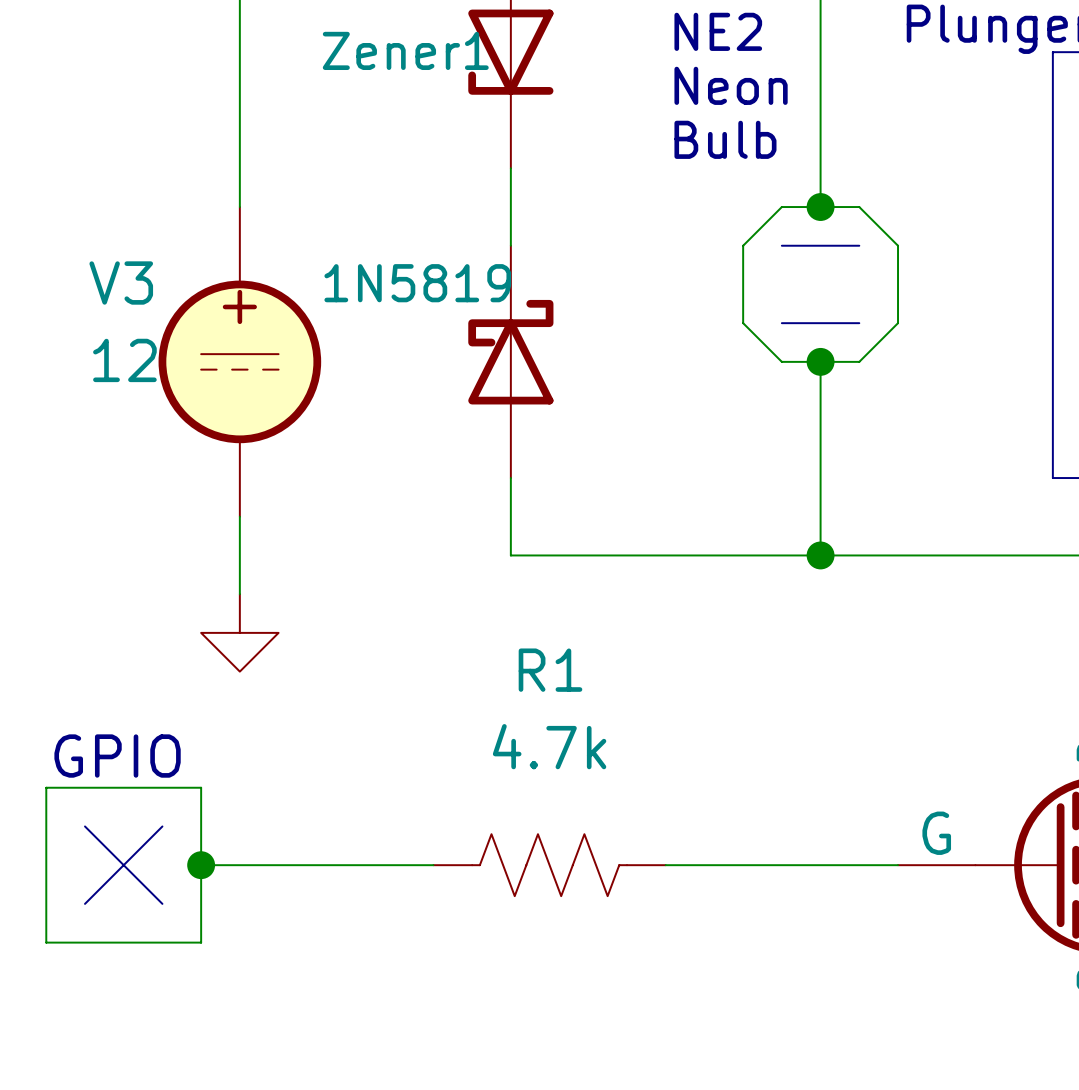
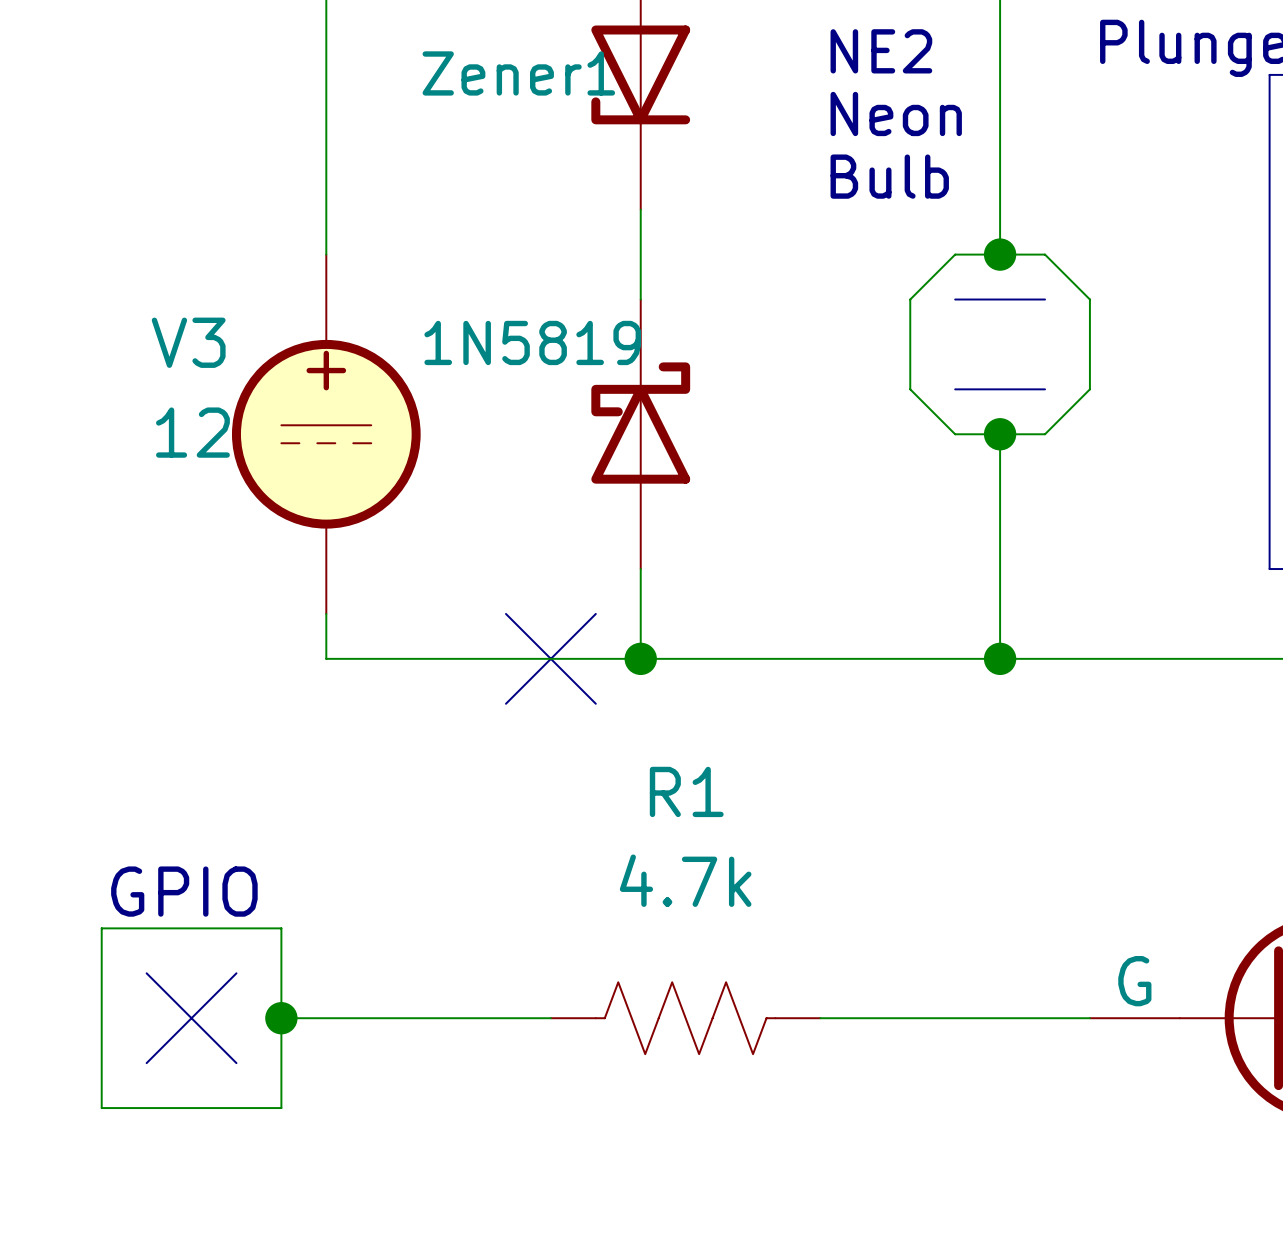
line: none -> (505, 613) (595, 703)
line: none -> (595, 613) (505, 703)
wire: (239, 555) (239, 594) -> (326, 658) (640, 658)
junction: none -> (640, 658)
power symbol: (239, 632) -> none

